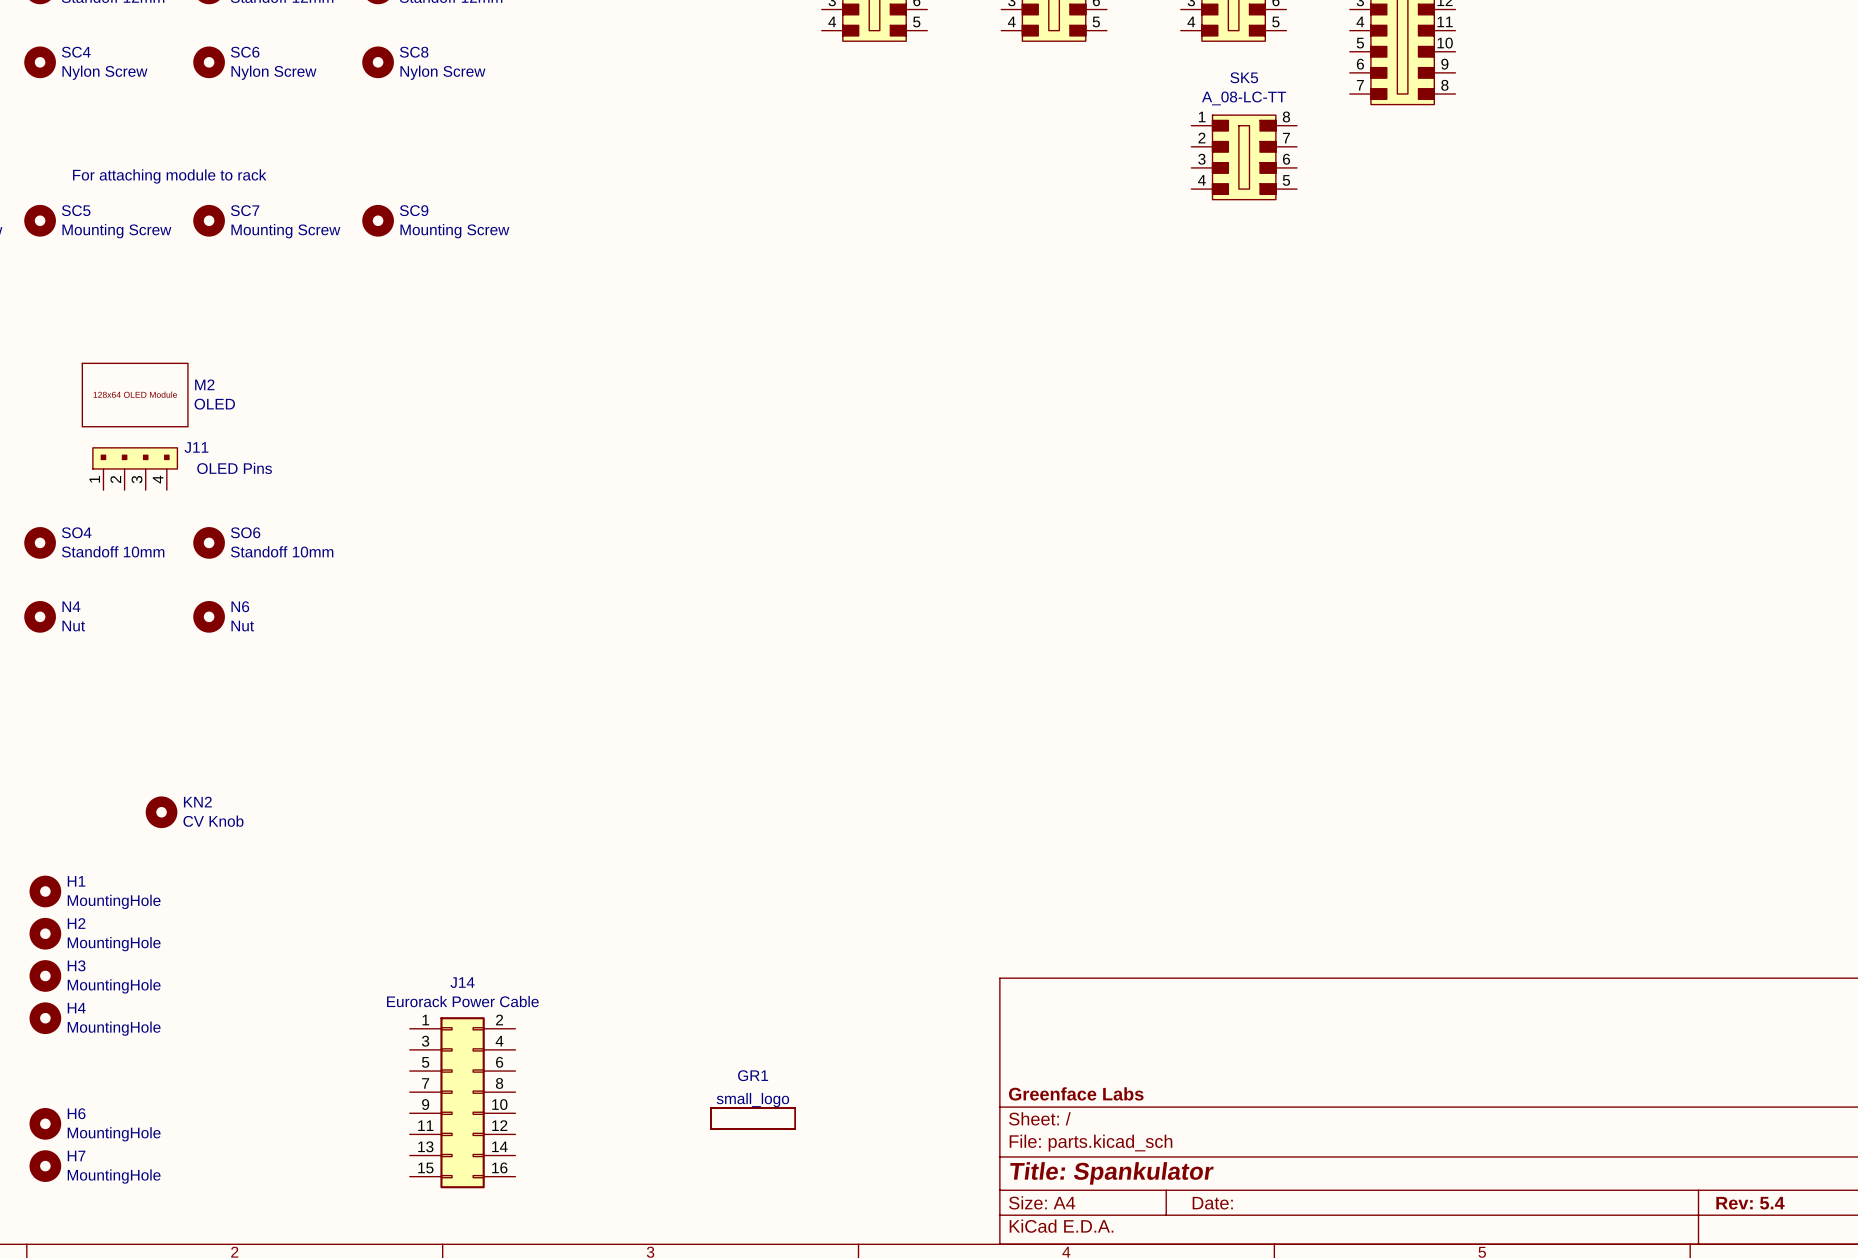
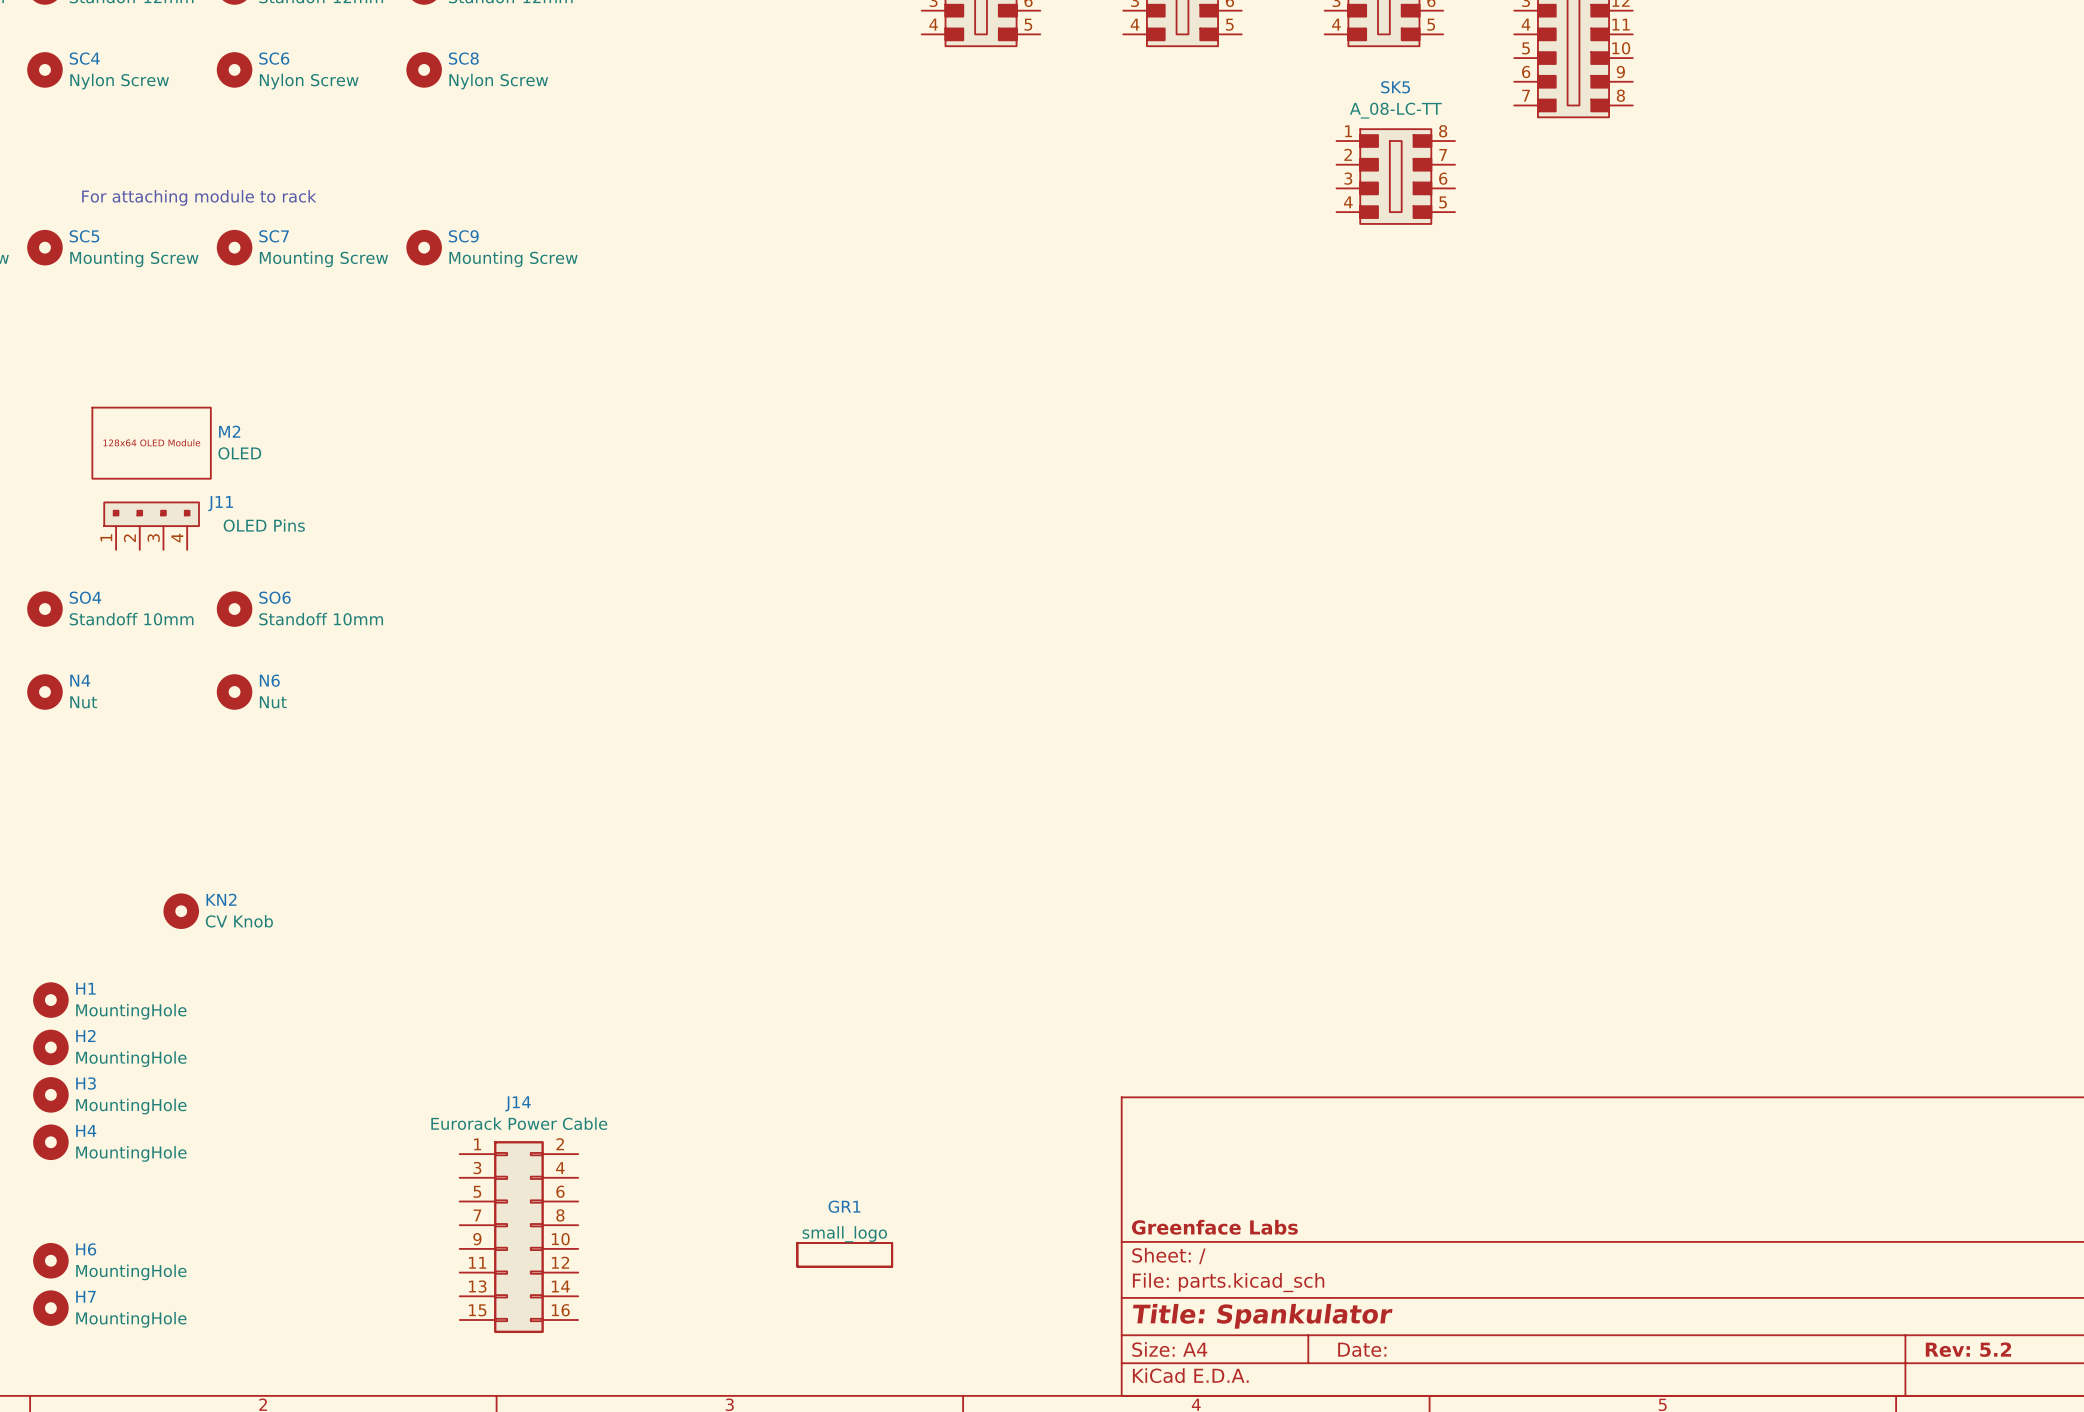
title block: Rev: 5.4 (1750, 1203) -> Rev: 5.2 (1968, 1349)

